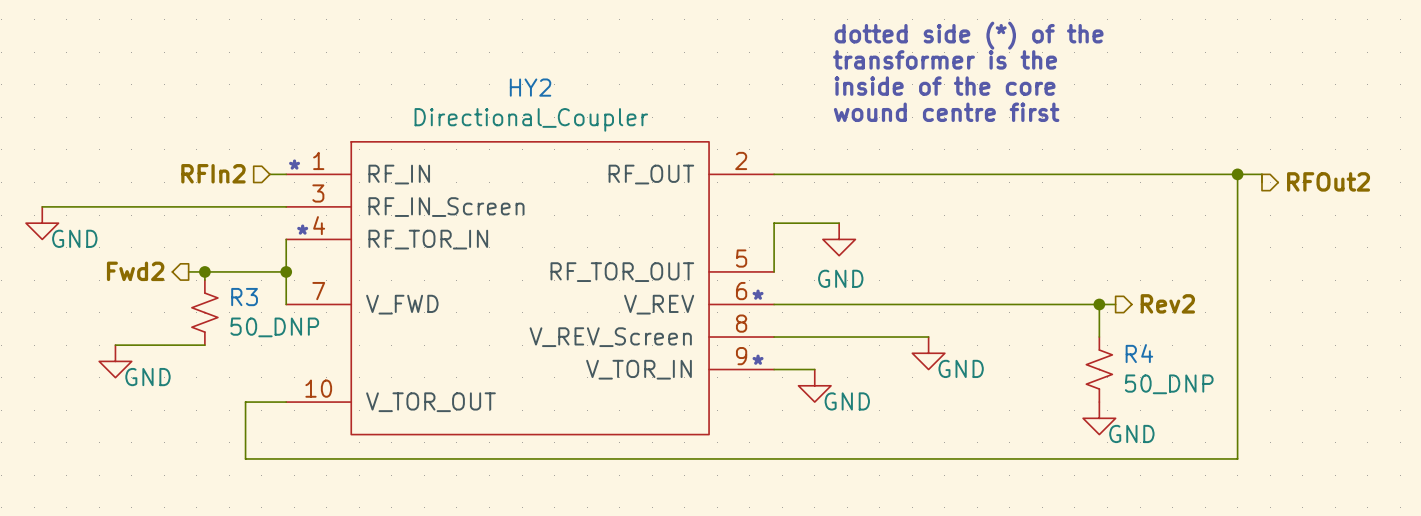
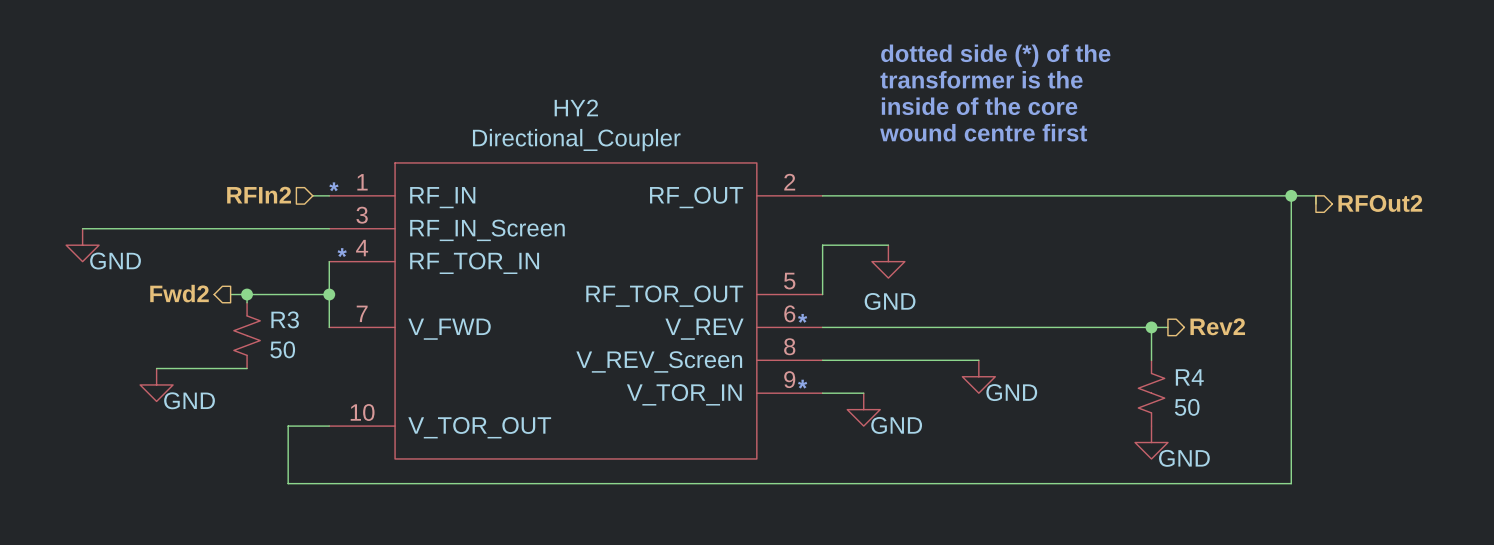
R3 value: 50_DNP (274, 327) -> 50 (282, 349)
R4 value: 50_DNP (1169, 384) -> 50 (1187, 407)

